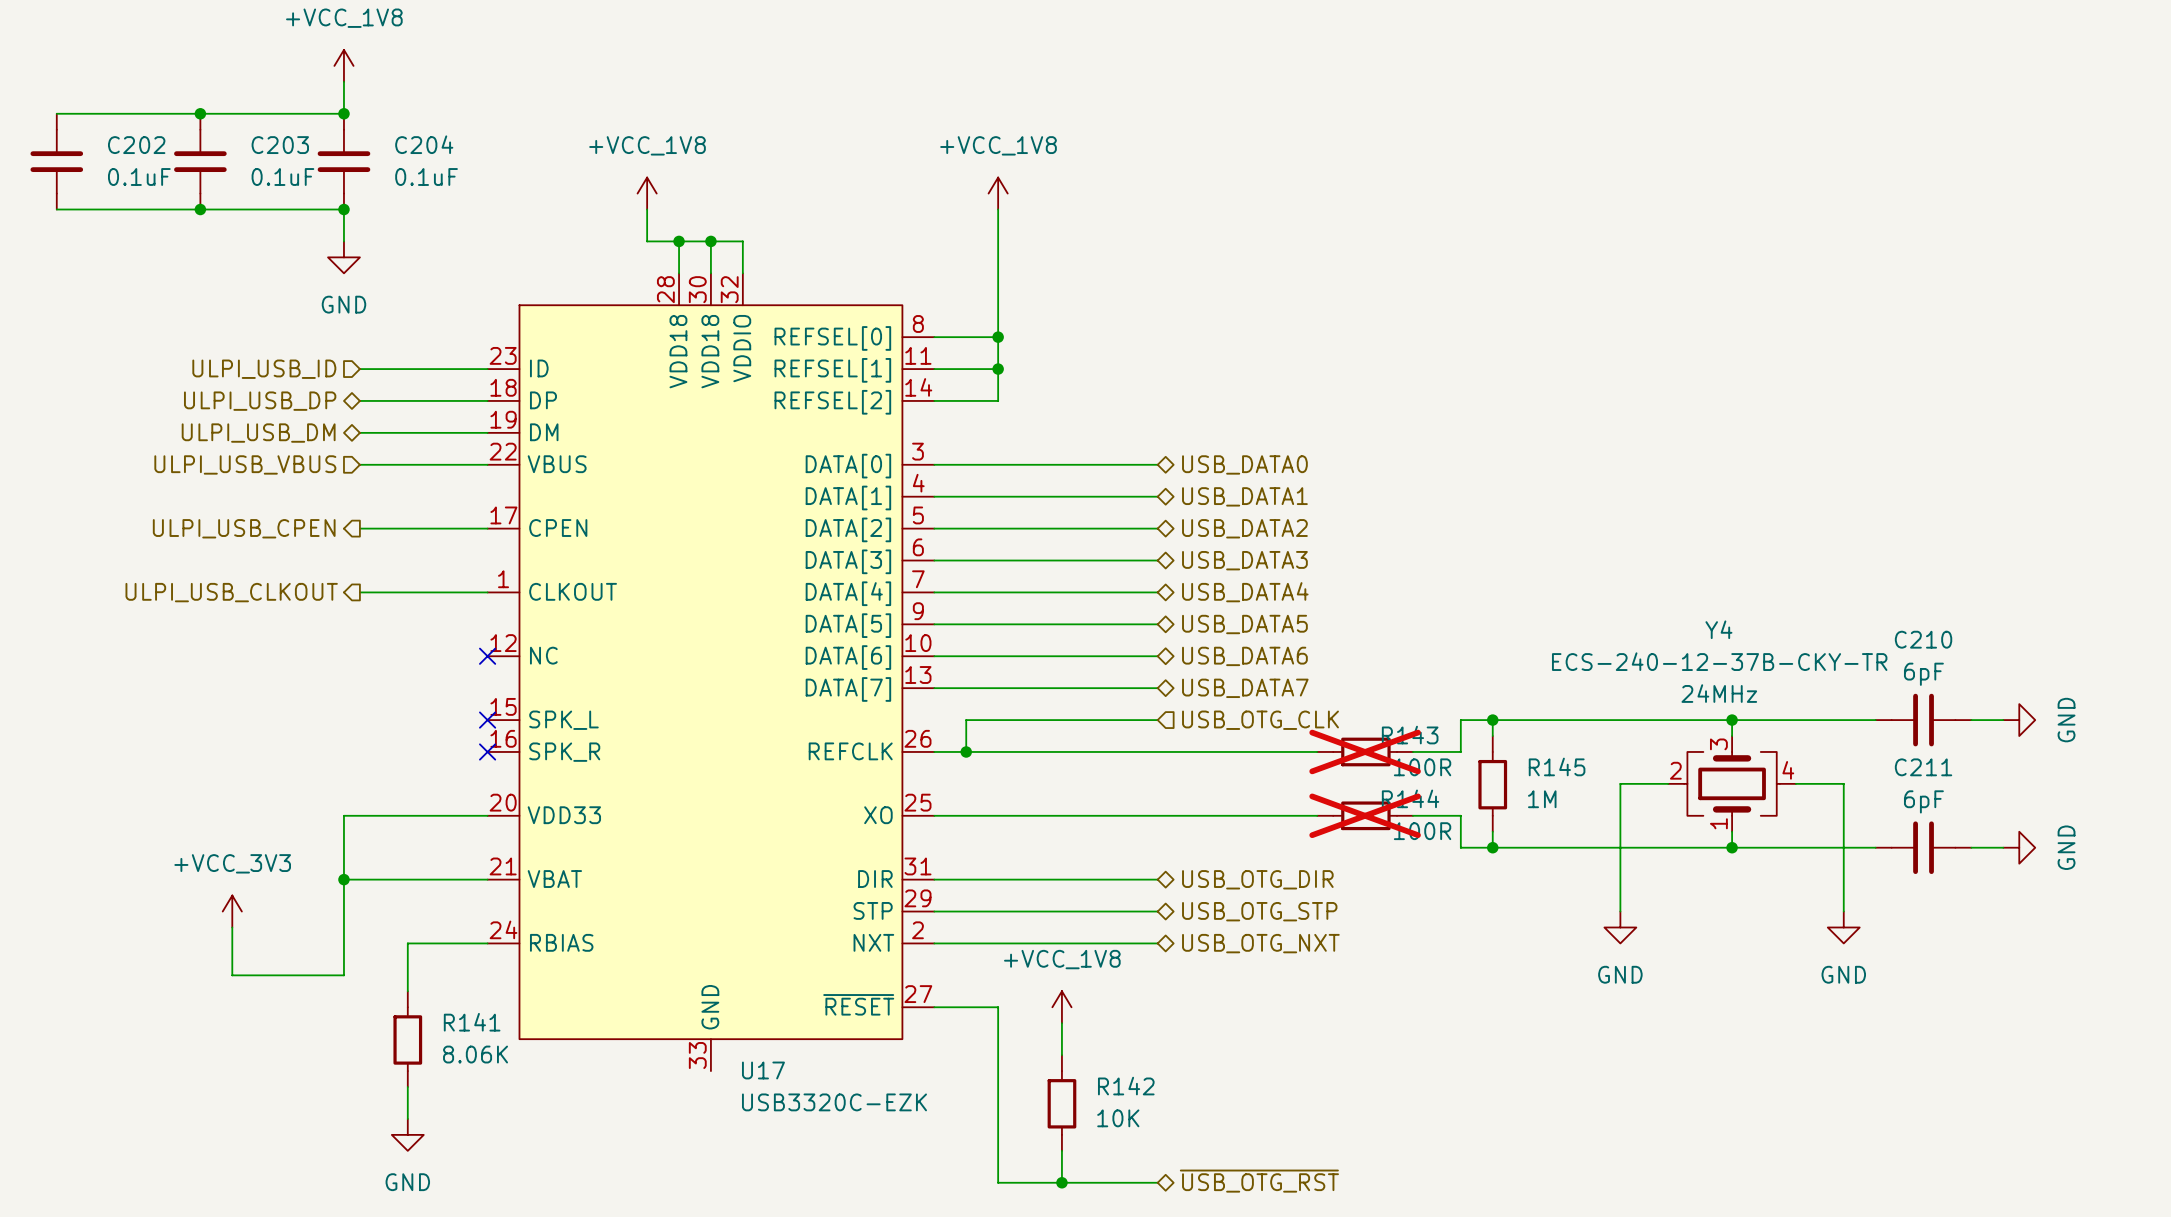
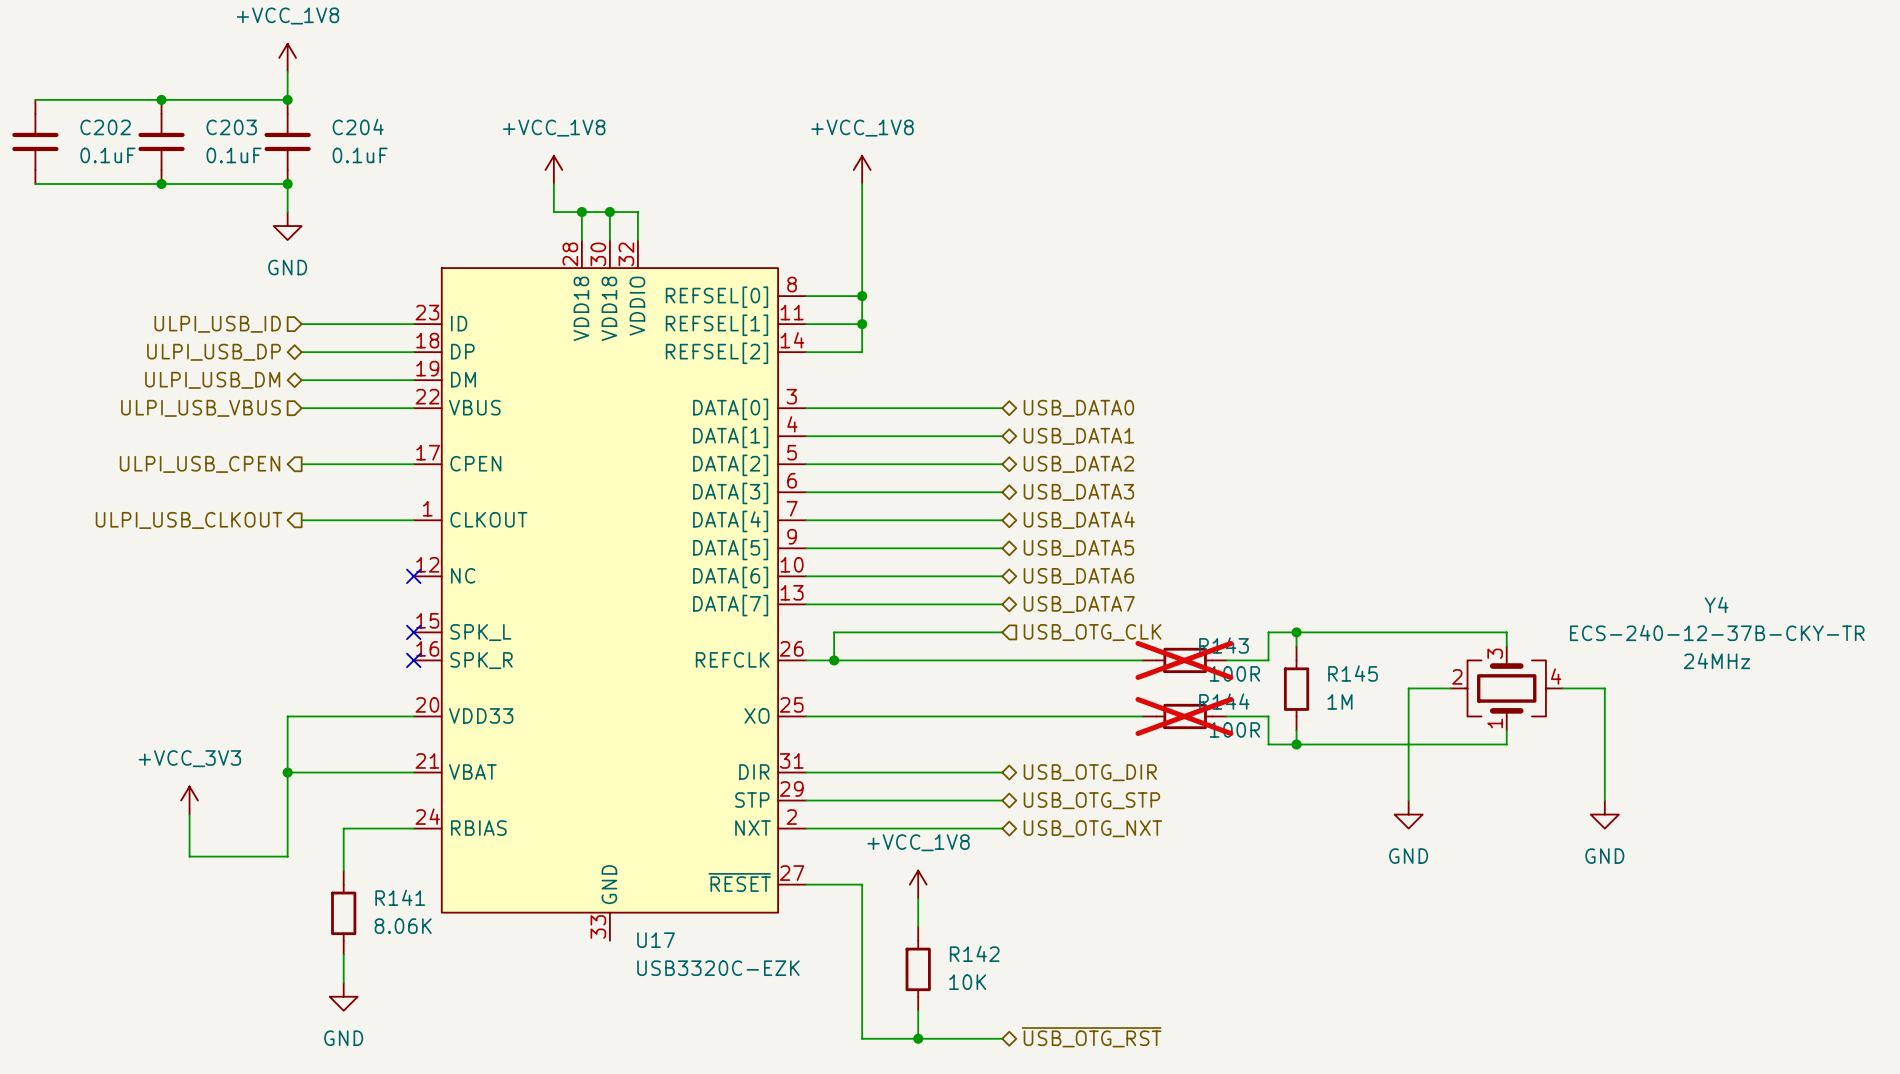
Y4 name position: Y4 (1718, 629) -> Y4 (1716, 604)
Y4 value position: ECS-240-12-37B-CKY-TR (1719, 661) -> ECS-240-12-37B-CKY-TR (1717, 632)
Y4 text position: 24MHz (1719, 693) -> 24MHz (1716, 660)
wire: (1732, 720) (1875, 720) -> none
junction: (1732, 720) -> none
C210: (1923, 720) -> none
wire: (1971, 720) (2003, 720) -> none
power symbol: GND (2019, 720) -> none
wire: (1732, 847) (1875, 847) -> none
junction: (1732, 847) -> none
C211: (1923, 847) -> none
wire: (1971, 847) (2003, 847) -> none
power symbol: GND (2019, 847) -> none

